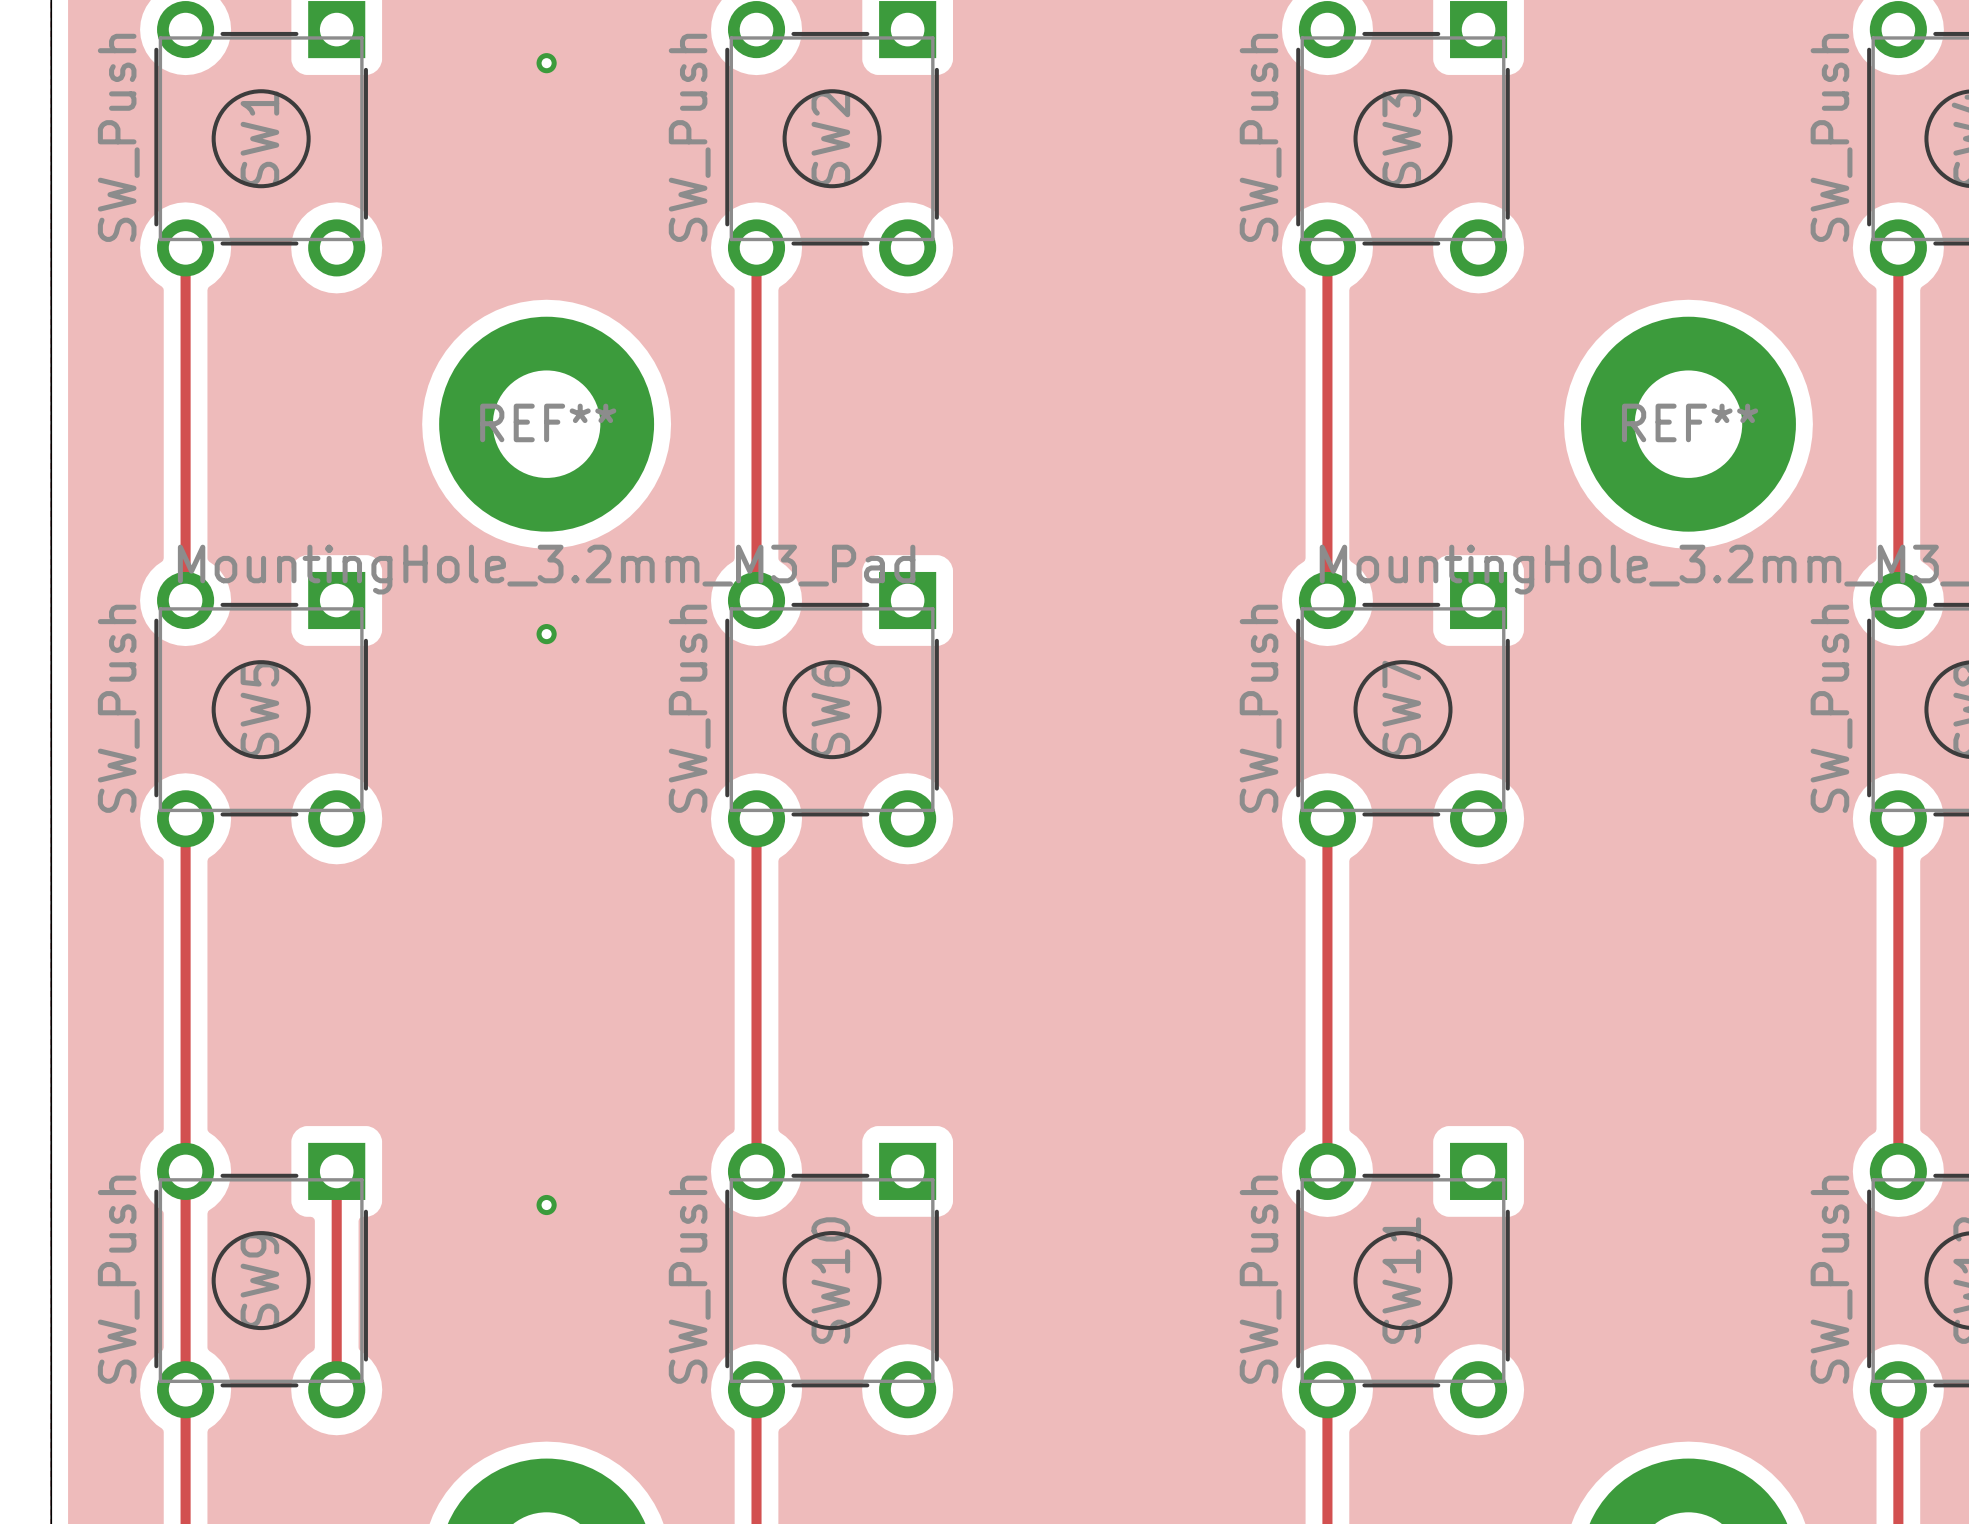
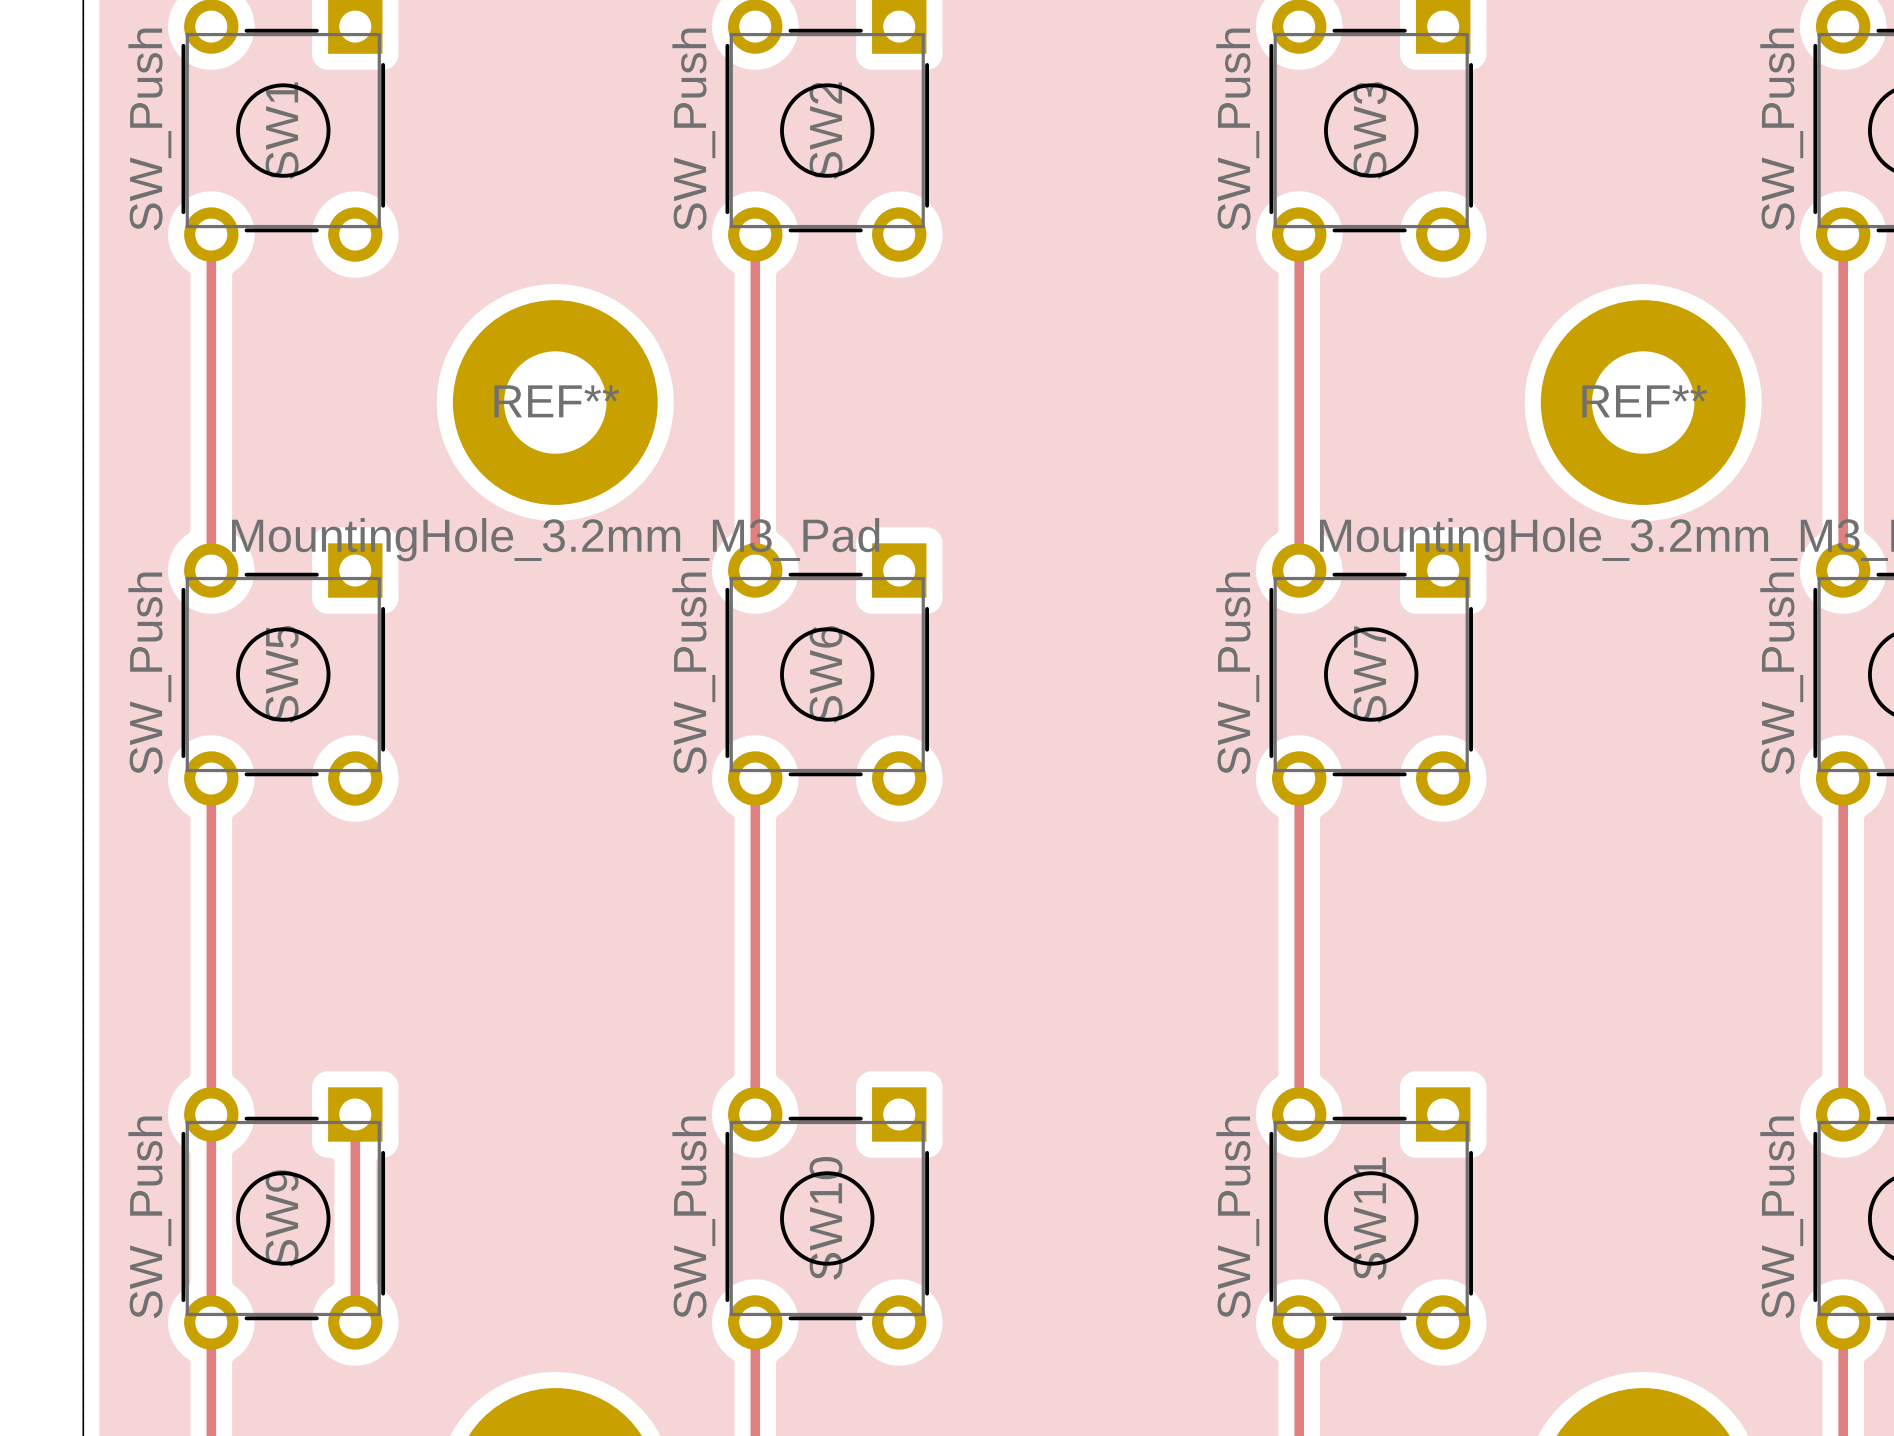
via: (546, 63) -> none
via: (546, 634) -> none
via: (546, 1205) -> none

